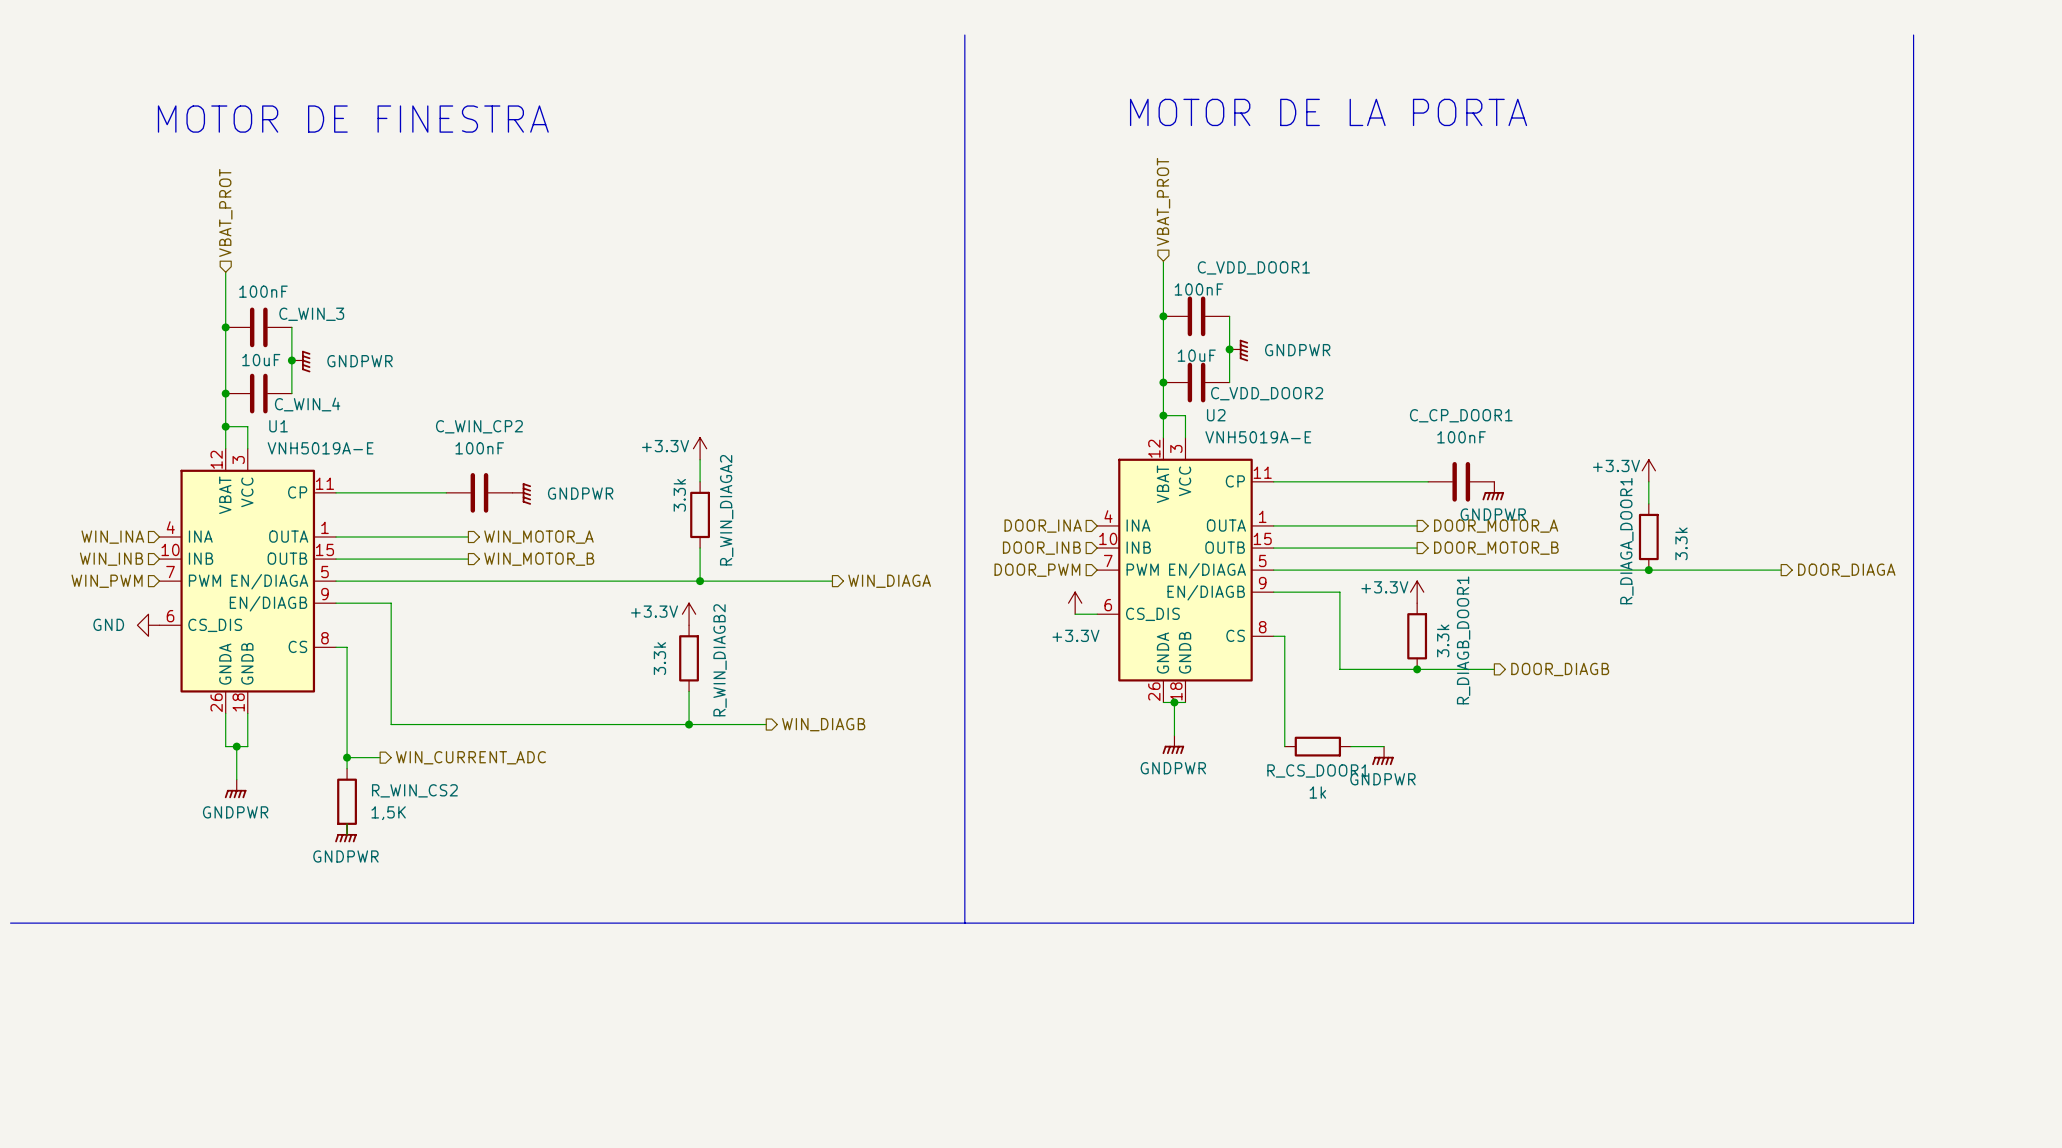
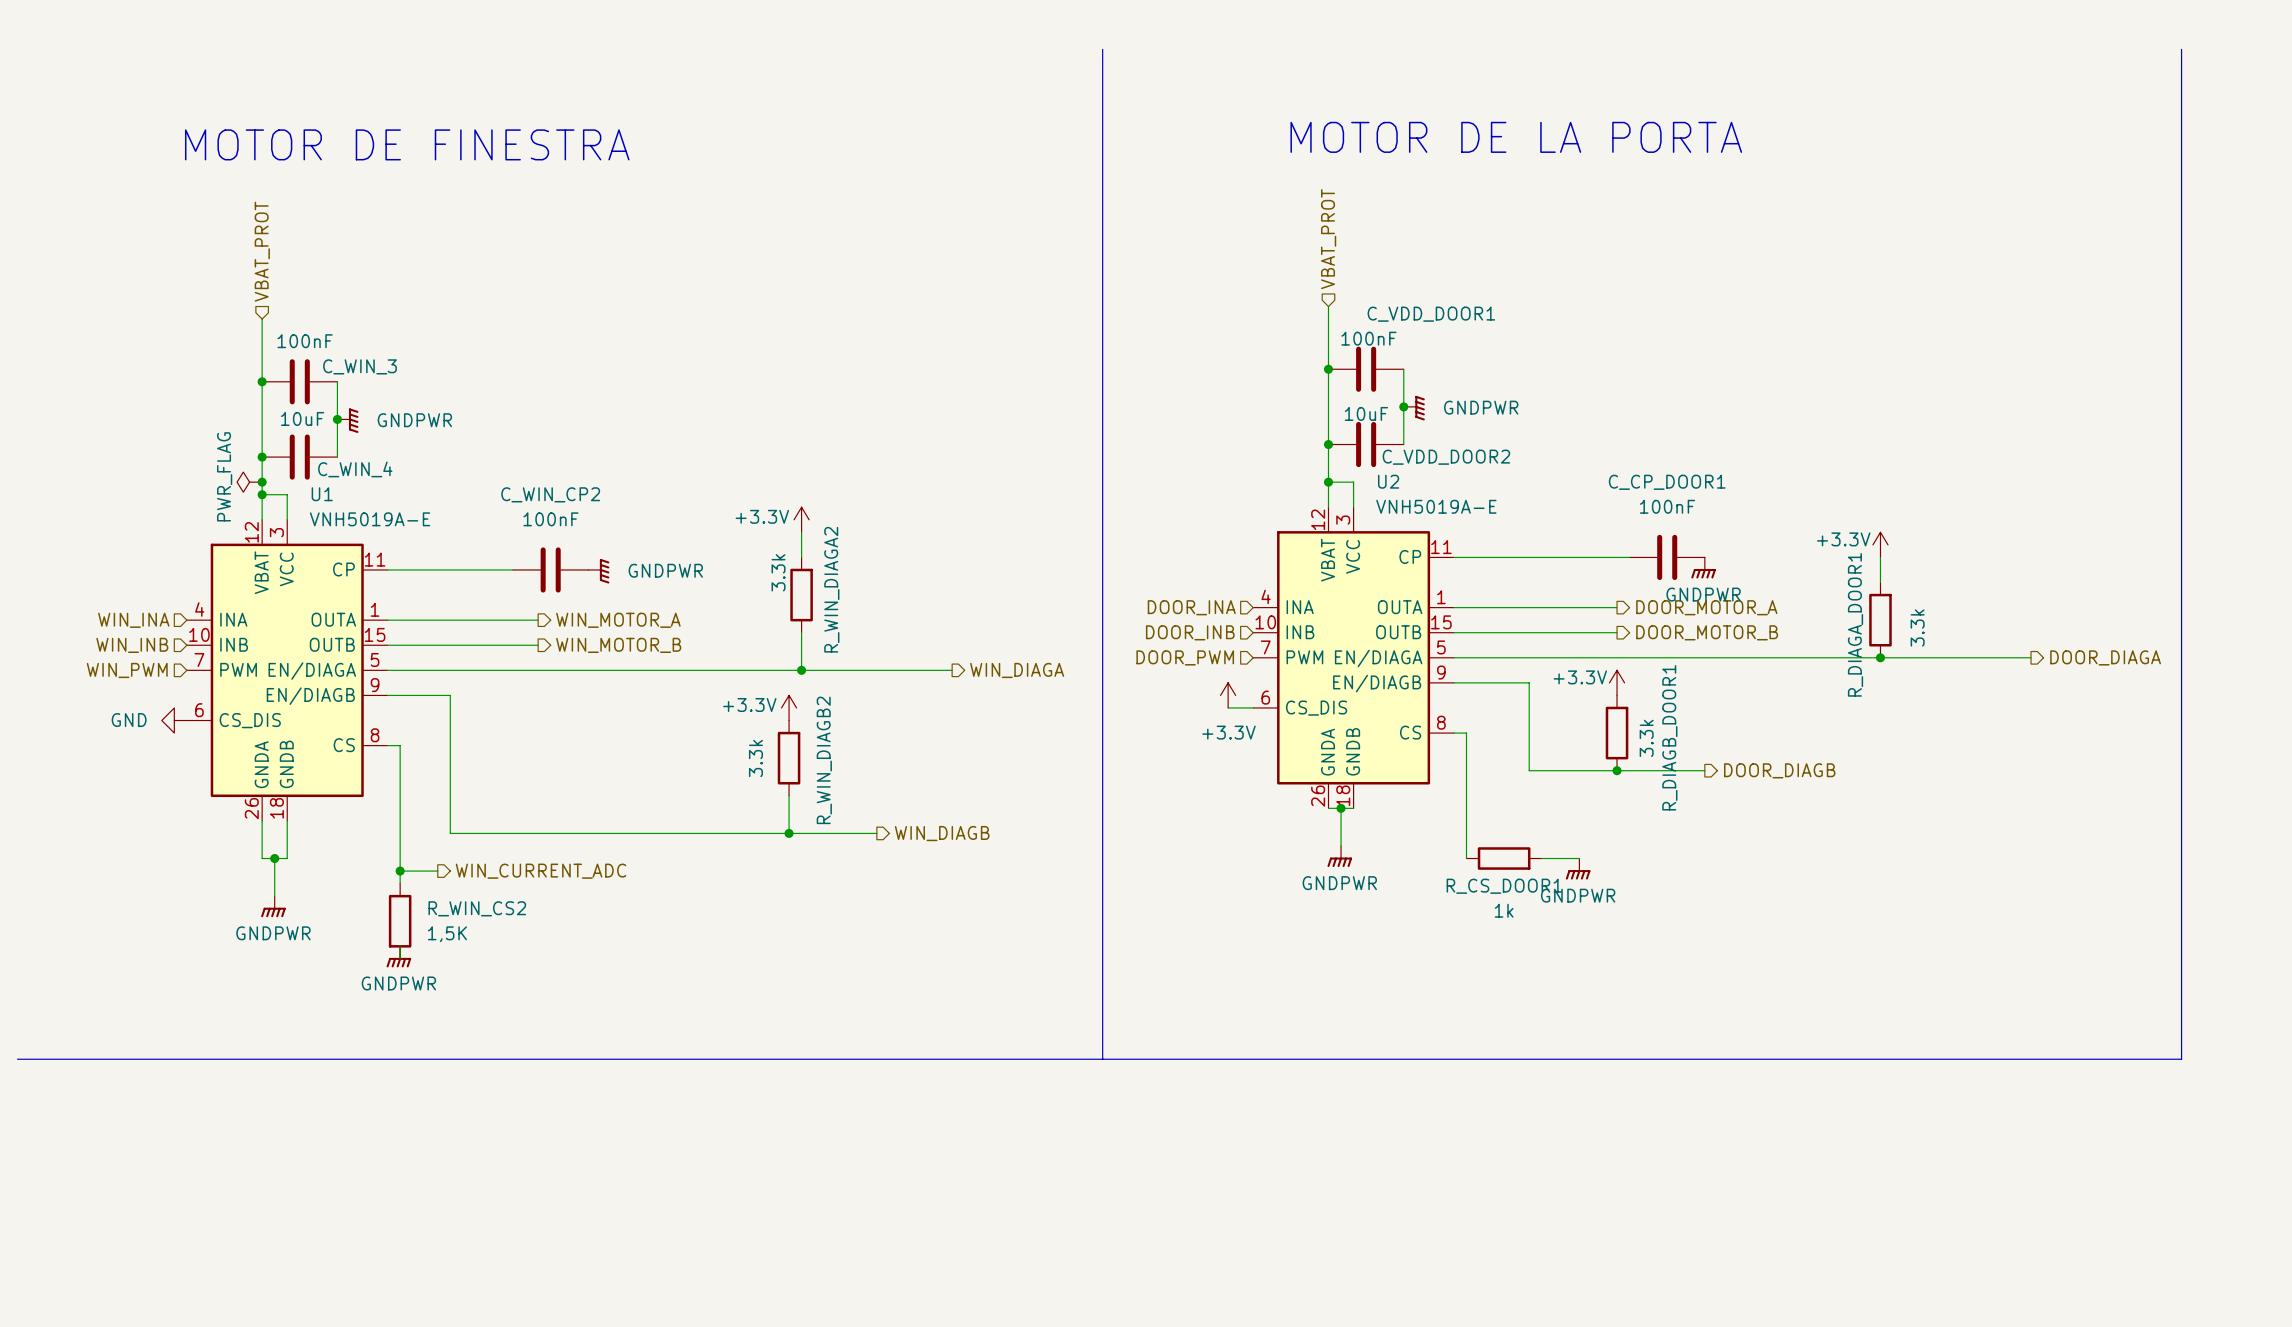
power symbol: none -> PWR_FLAG (249, 482)
junction: none -> (262, 482)

